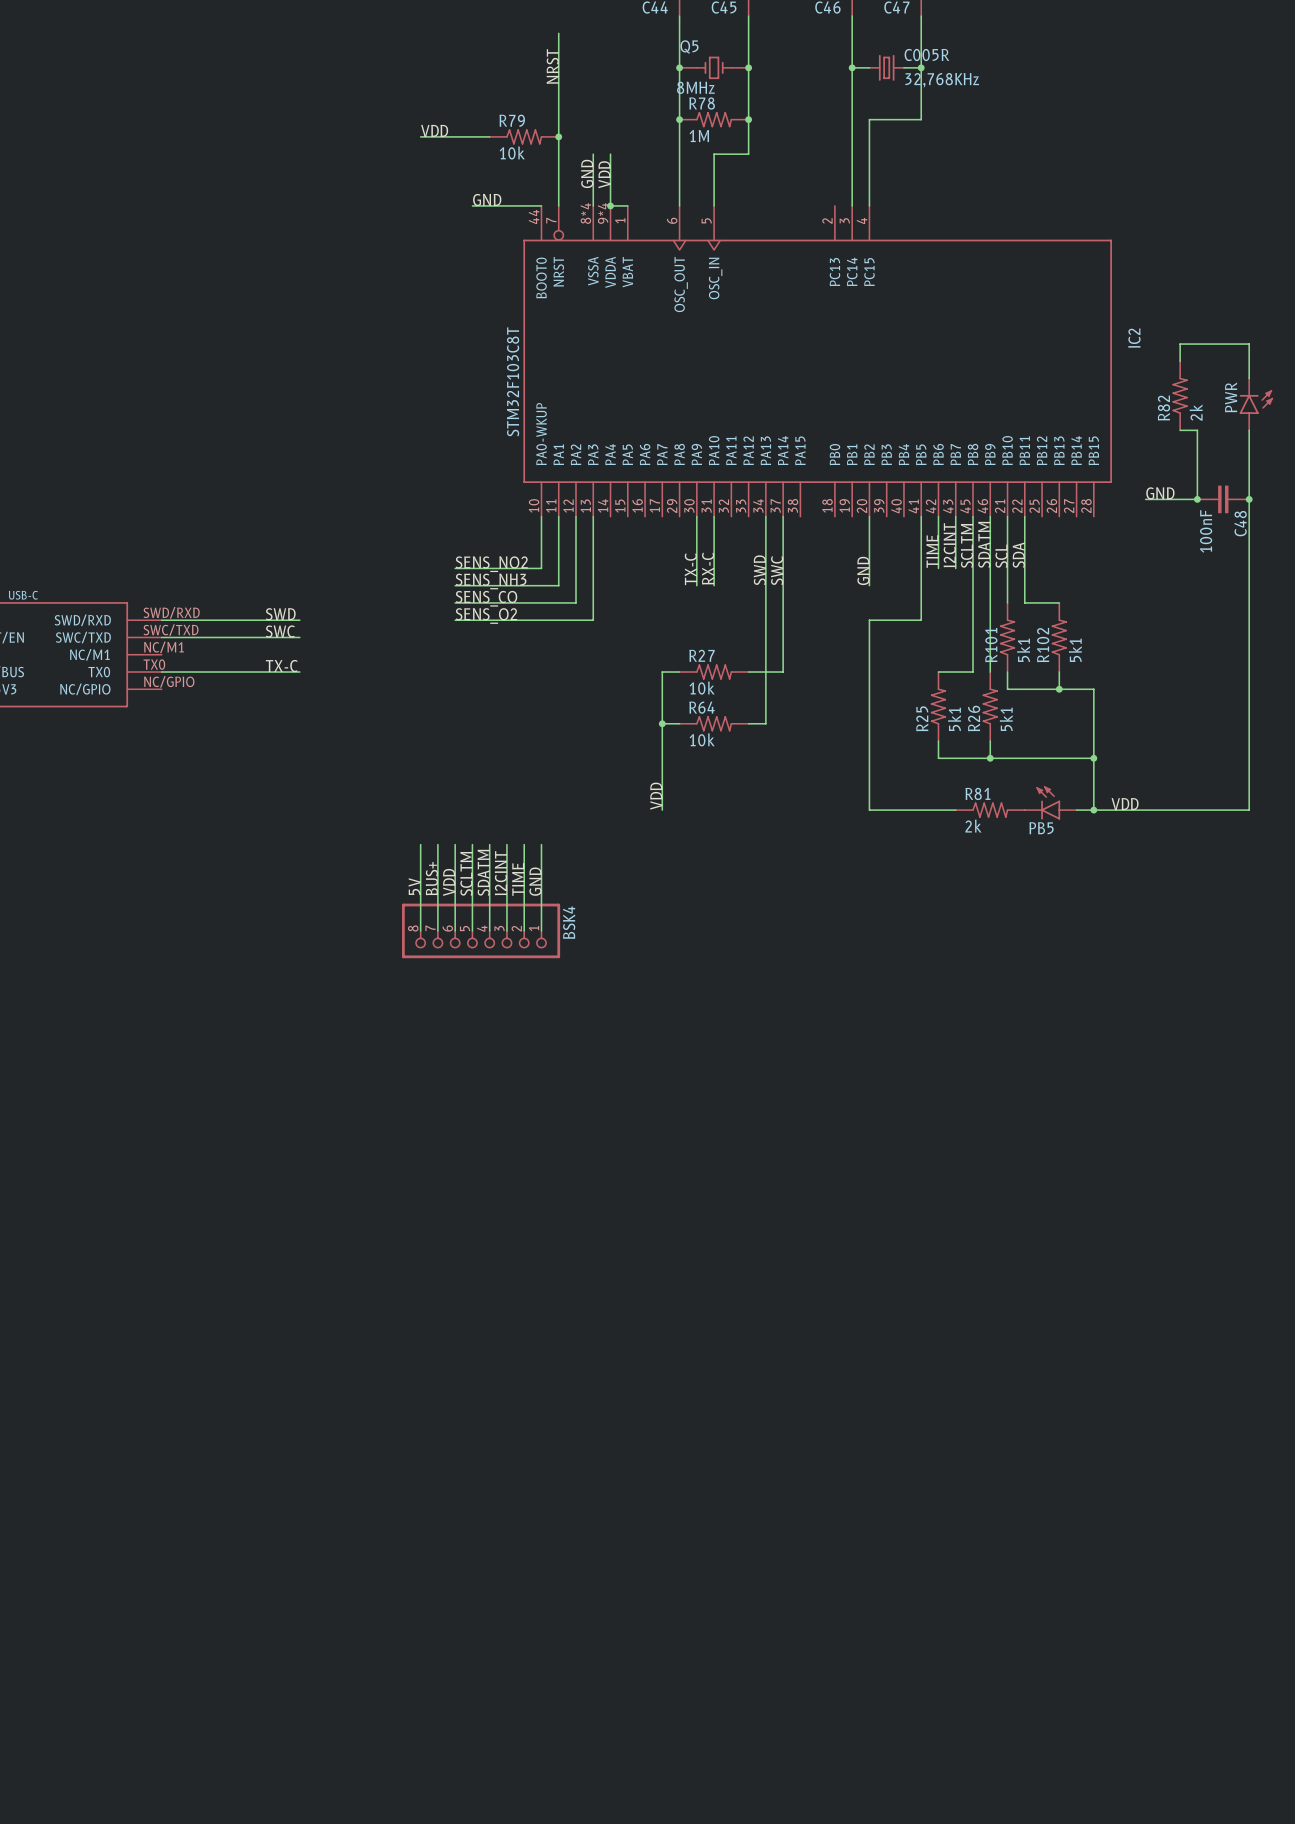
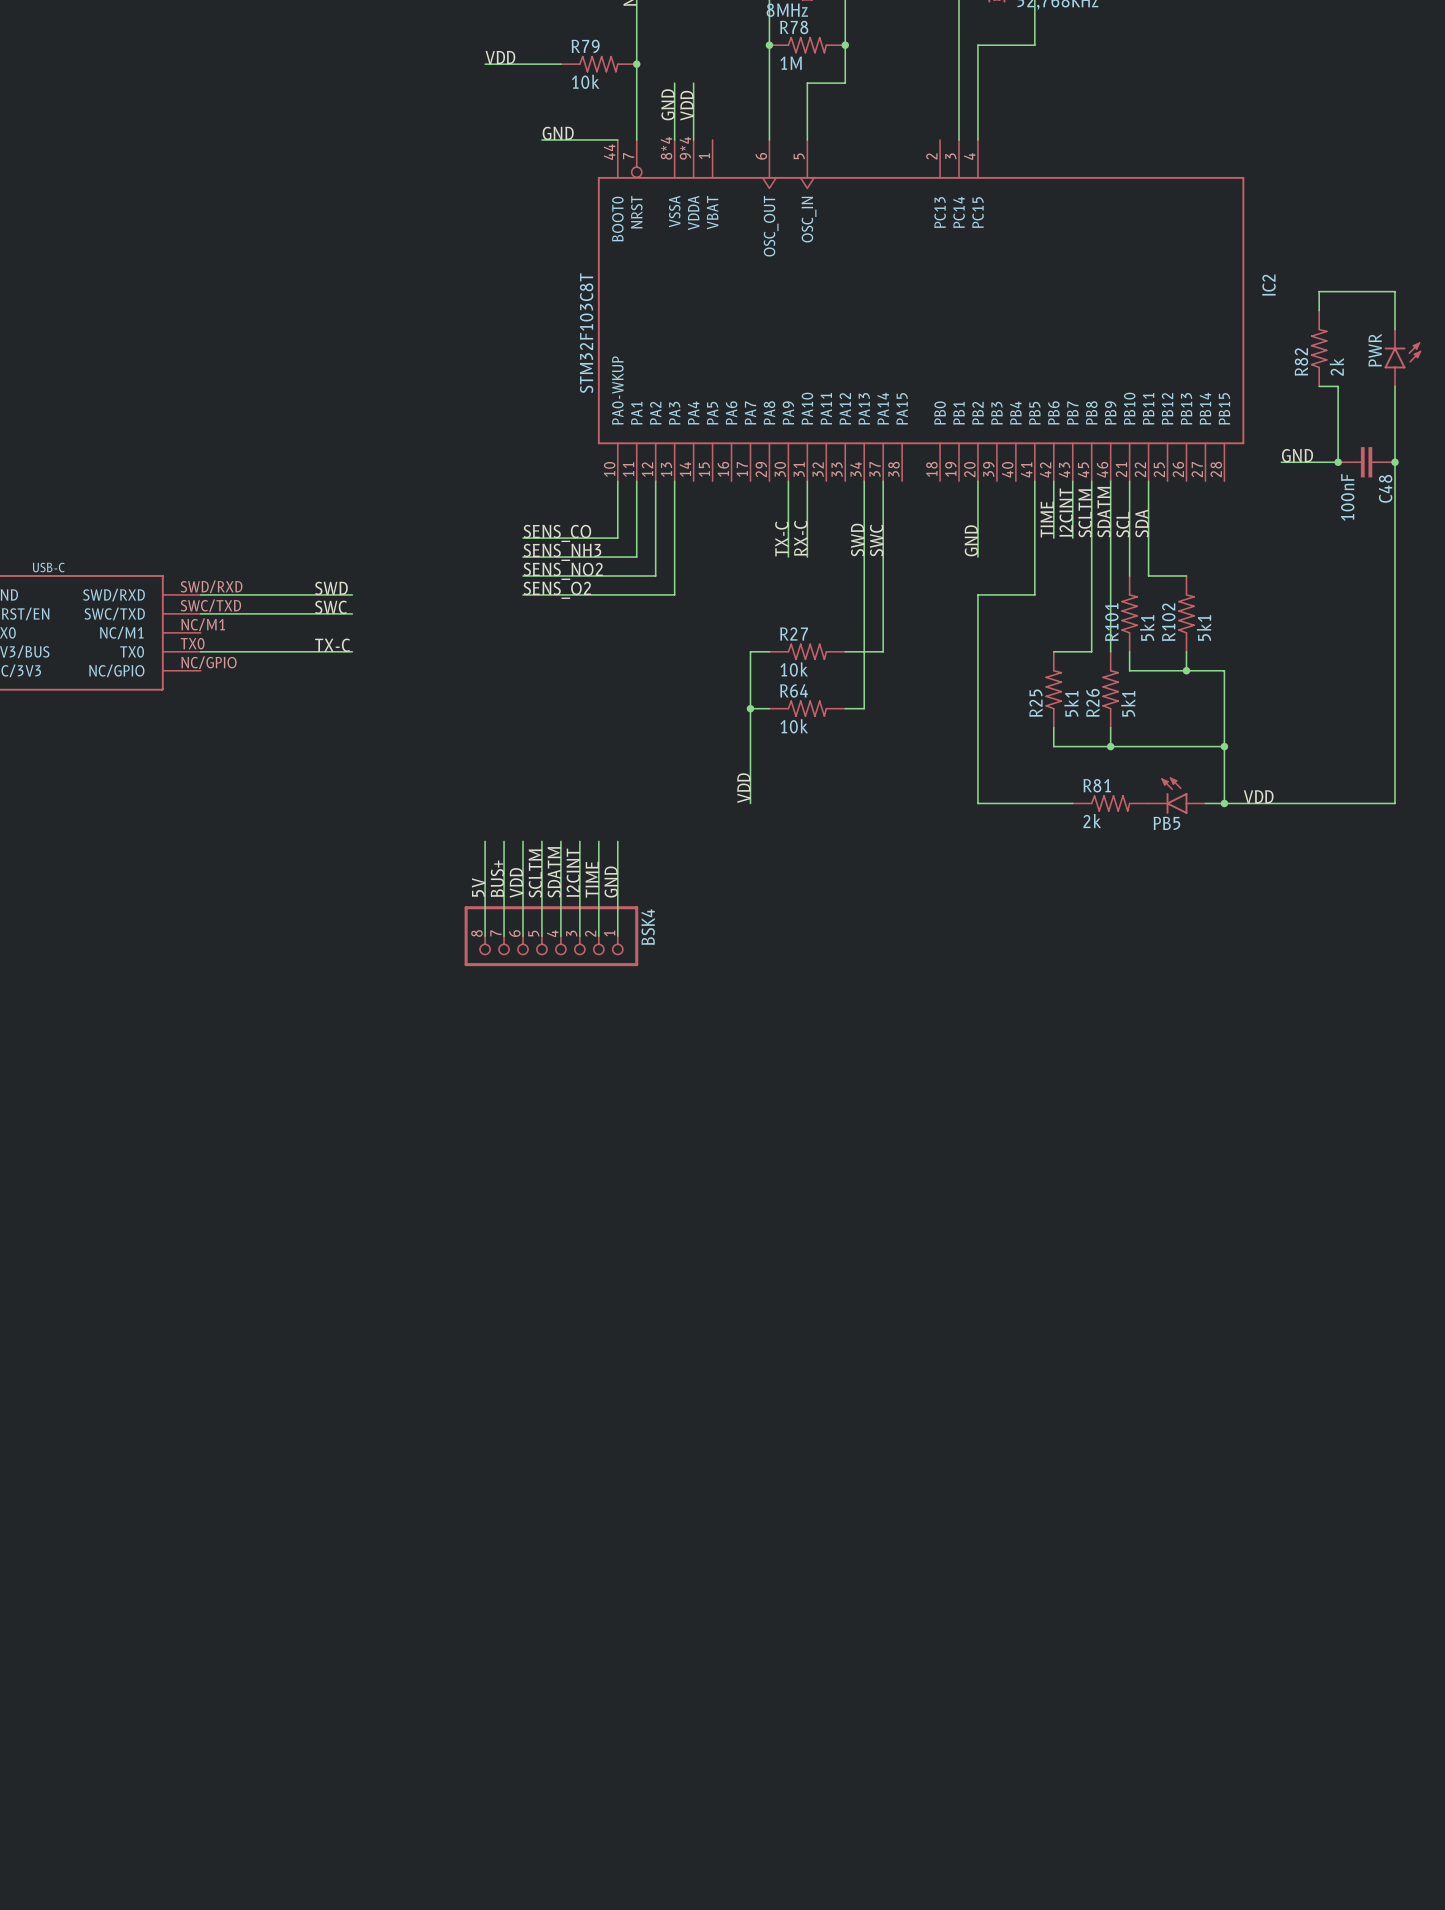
wire: (610, 205) (627, 205) -> none
junction: (610, 205) -> none
label: SENS_NO2 (491, 564) -> SENS_CO (557, 533)
label: SENS_CO (486, 598) -> SENS_NO2 (563, 571)

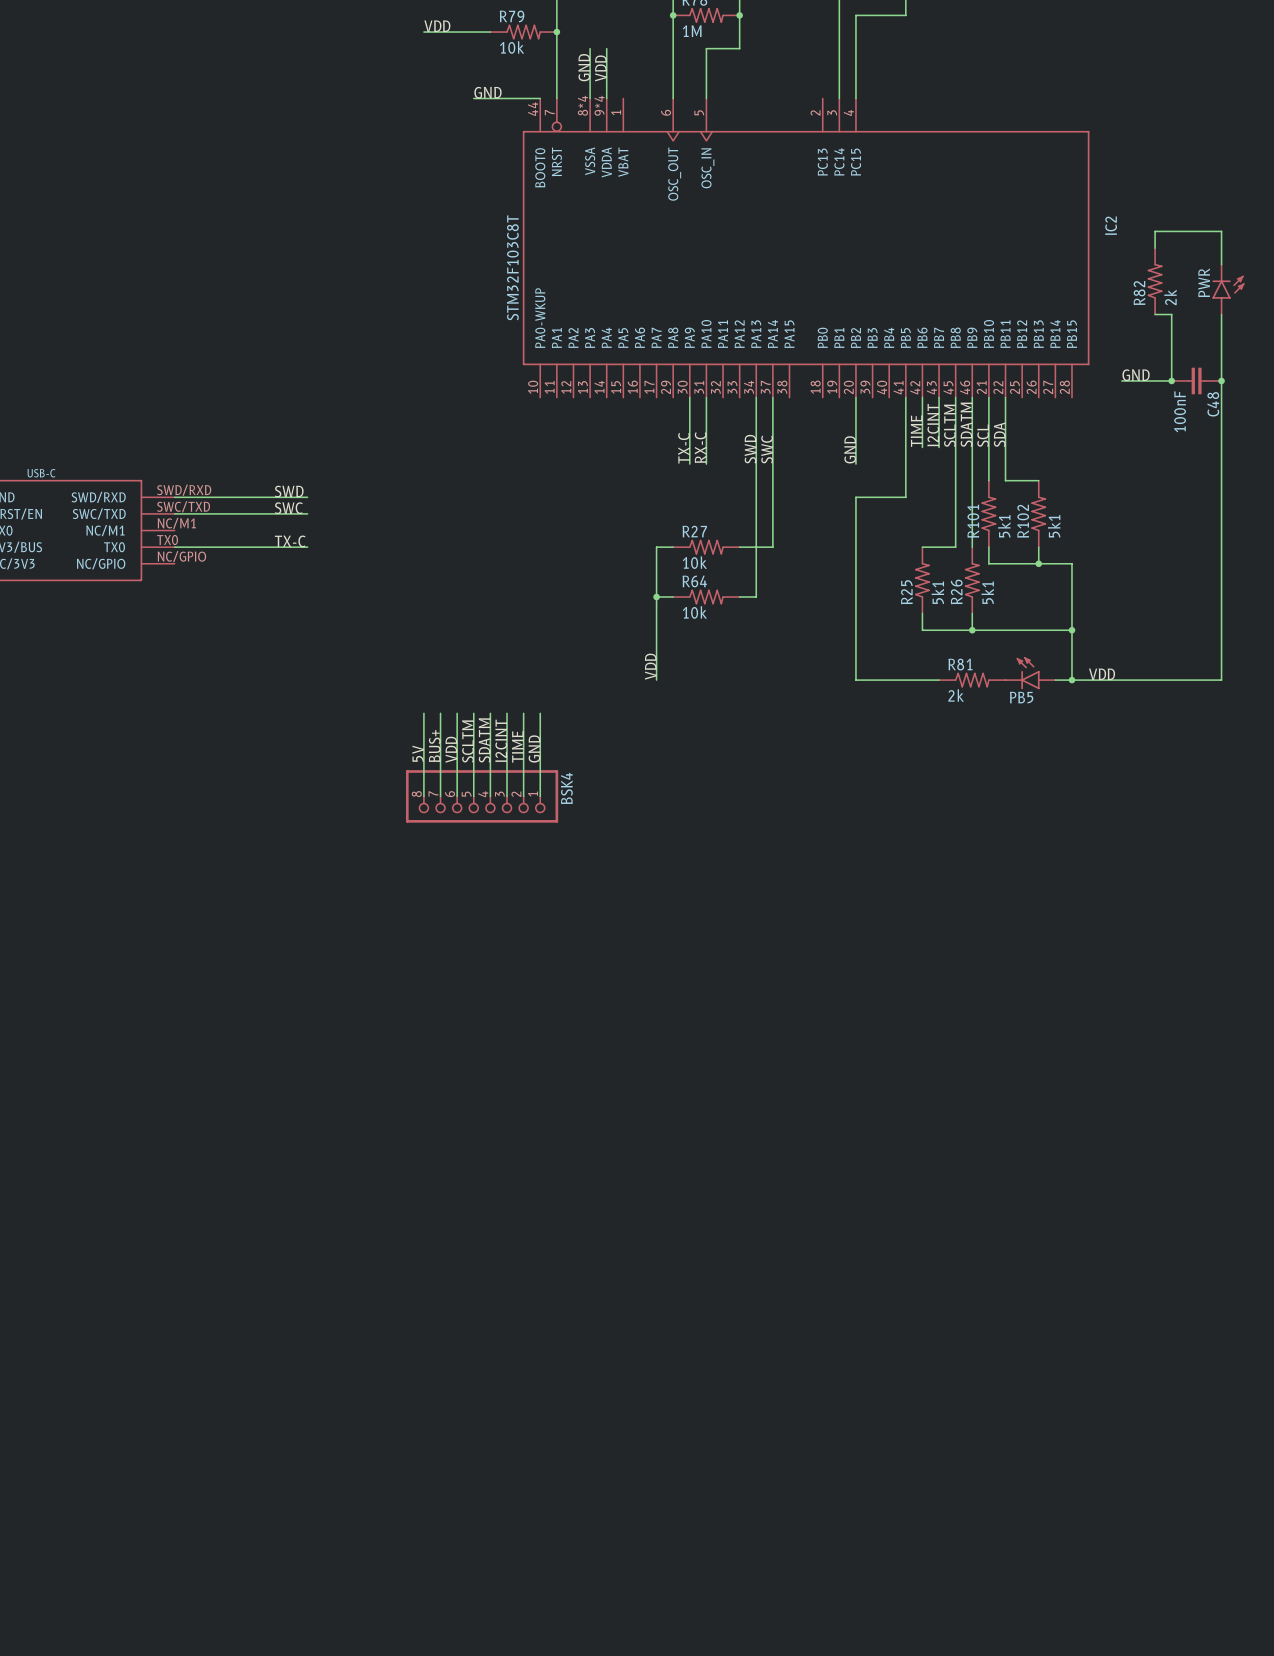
wire: (617, 481) (617, 538) (522, 538) -> none
wire: (636, 481) (636, 557) (522, 557) -> none
wire: (655, 481) (655, 575) (522, 575) -> none
wire: (674, 481) (674, 594) (522, 594) -> none
label: SENS_CO (557, 533) -> none
label: SENS_NH3 (562, 552) -> none
label: SENS_NO2 (563, 571) -> none
label: SENS_O2 (557, 590) -> none

